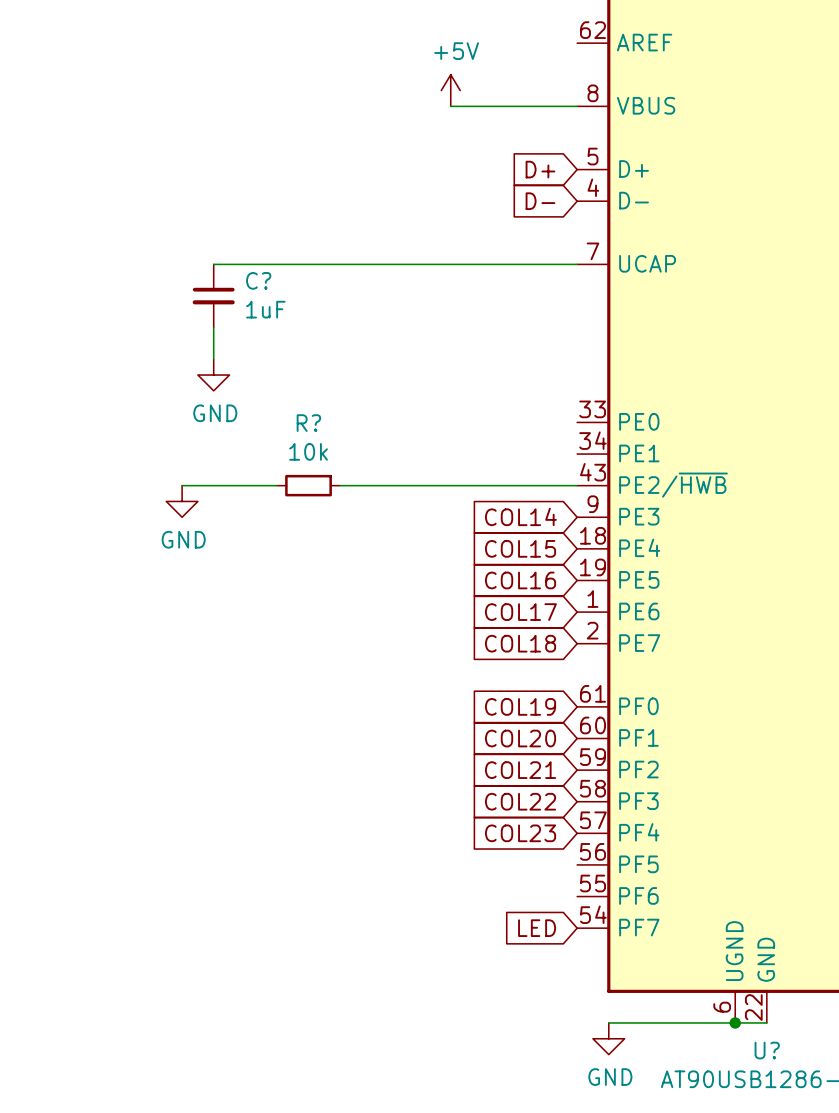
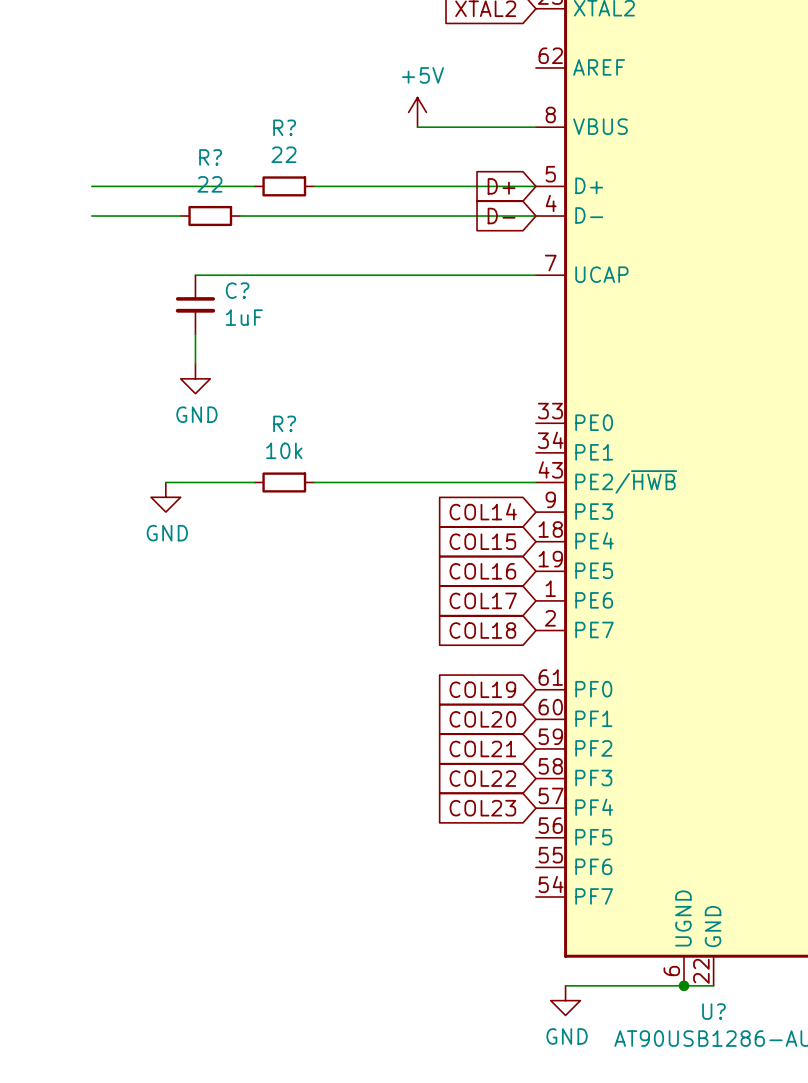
wire: none -> (91, 186) (254, 186)
R?: none -> 22 (284, 186)
wire: none -> (313, 186) (535, 186)
wire: none -> (91, 216) (180, 216)
R?: none -> 22 (210, 216)
wire: none -> (239, 216) (535, 216)
global label: LED (537, 928) -> none

